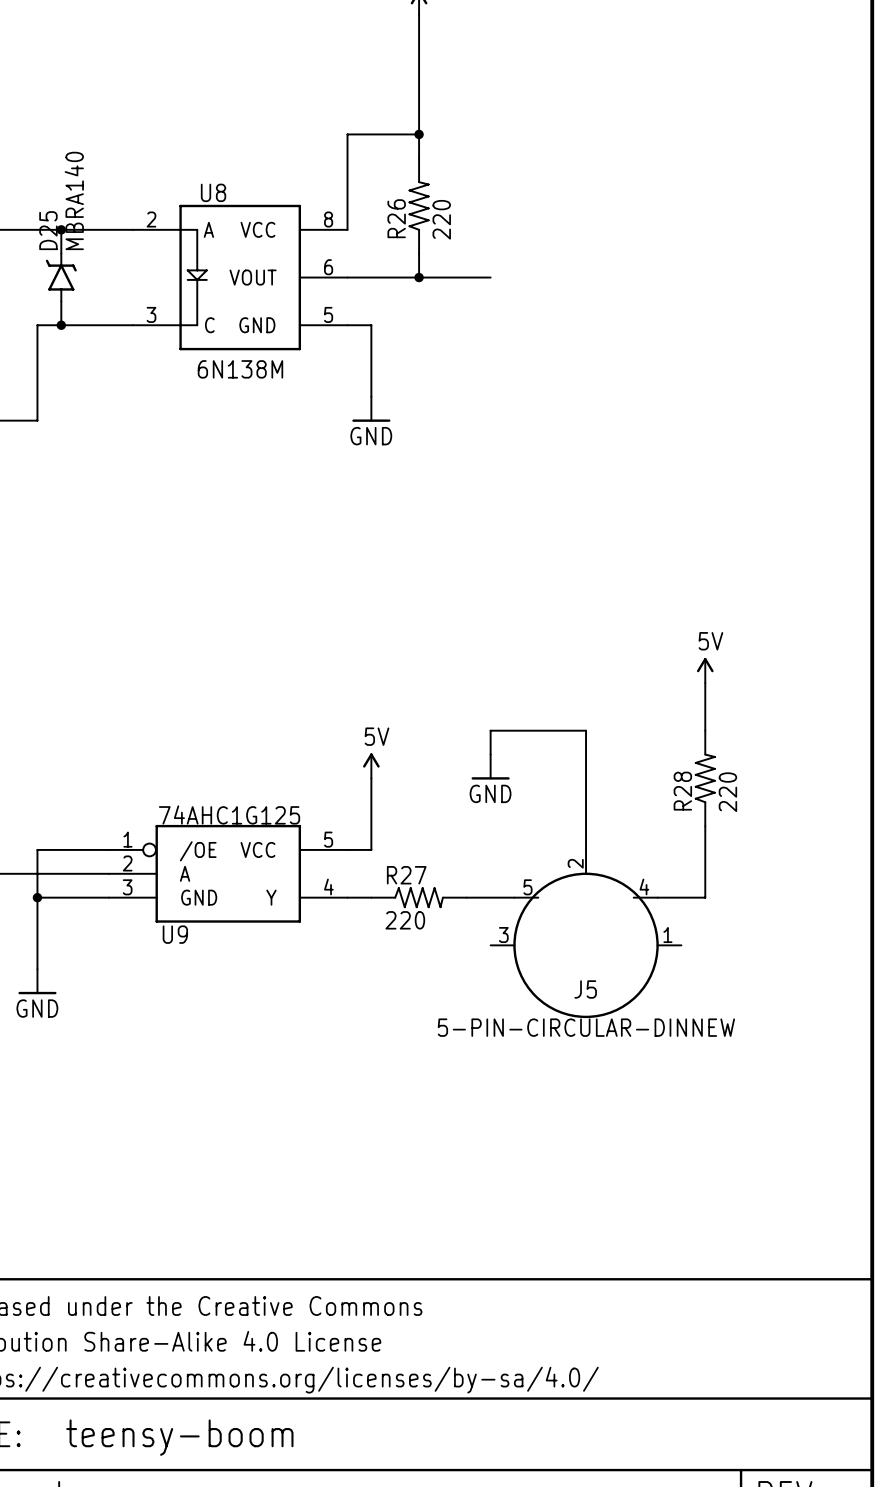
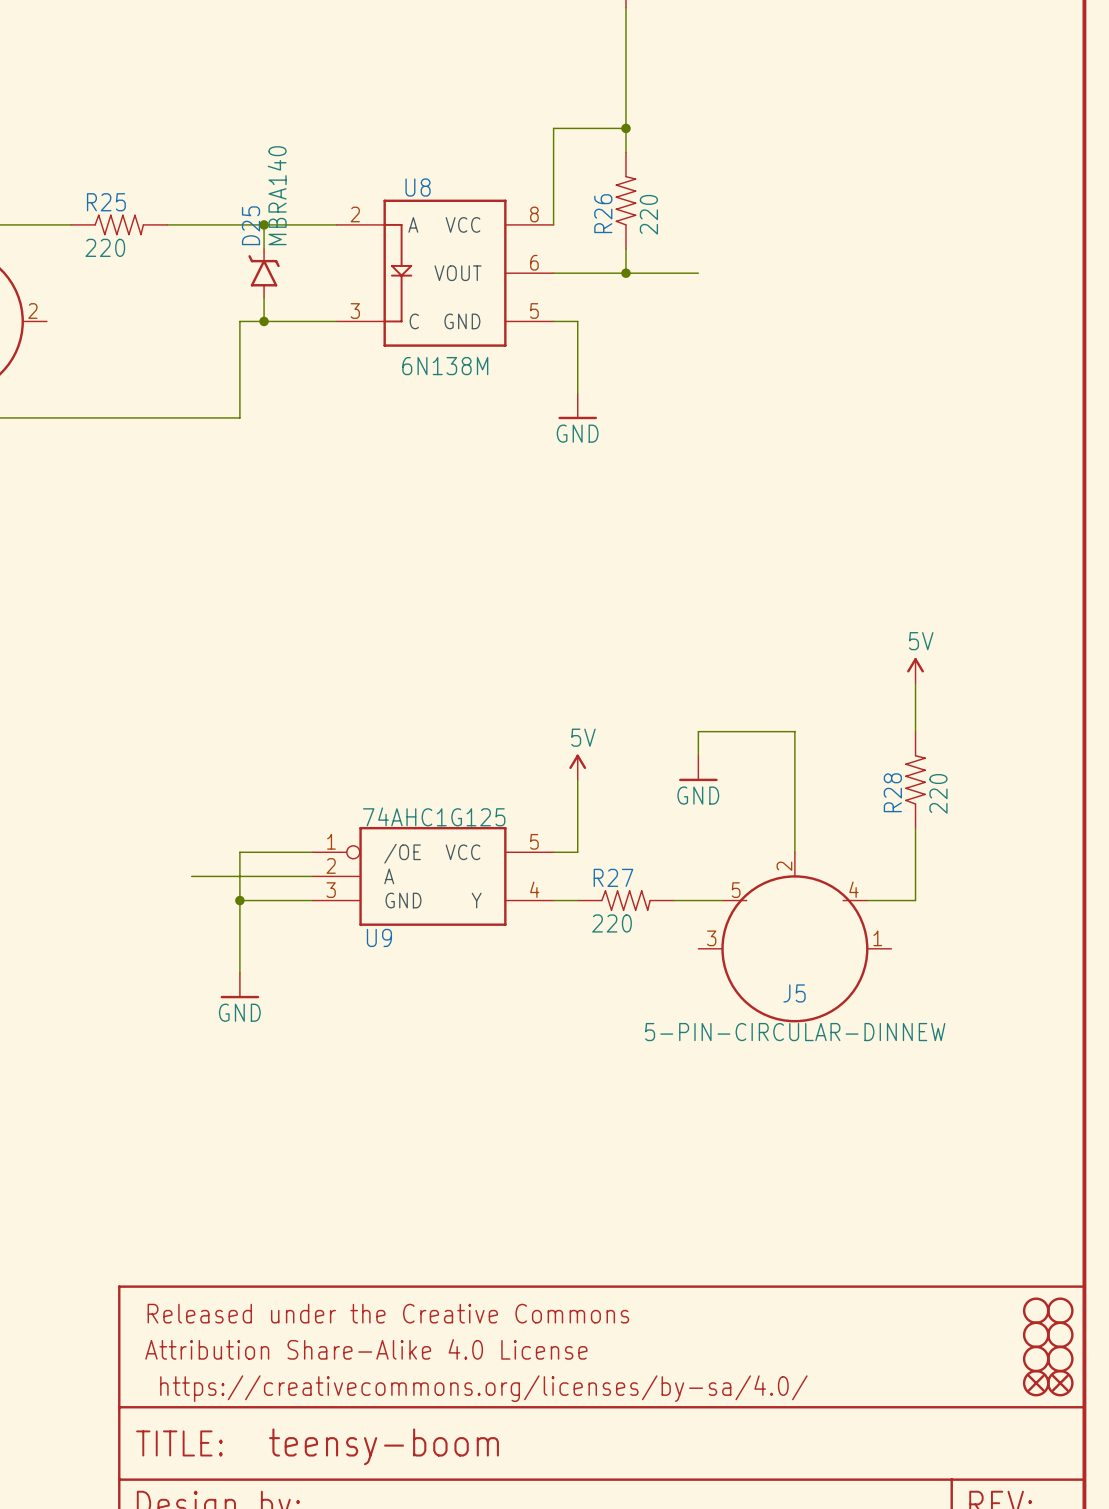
part: none -> (1036, 1310)
part: none -> (1060, 1310)
part: none -> (1036, 1334)
part: none -> (1060, 1334)
part: none -> (1036, 1359)
part: none -> (1060, 1359)
part: none -> (1036, 1383)
part: none -> (1060, 1383)

